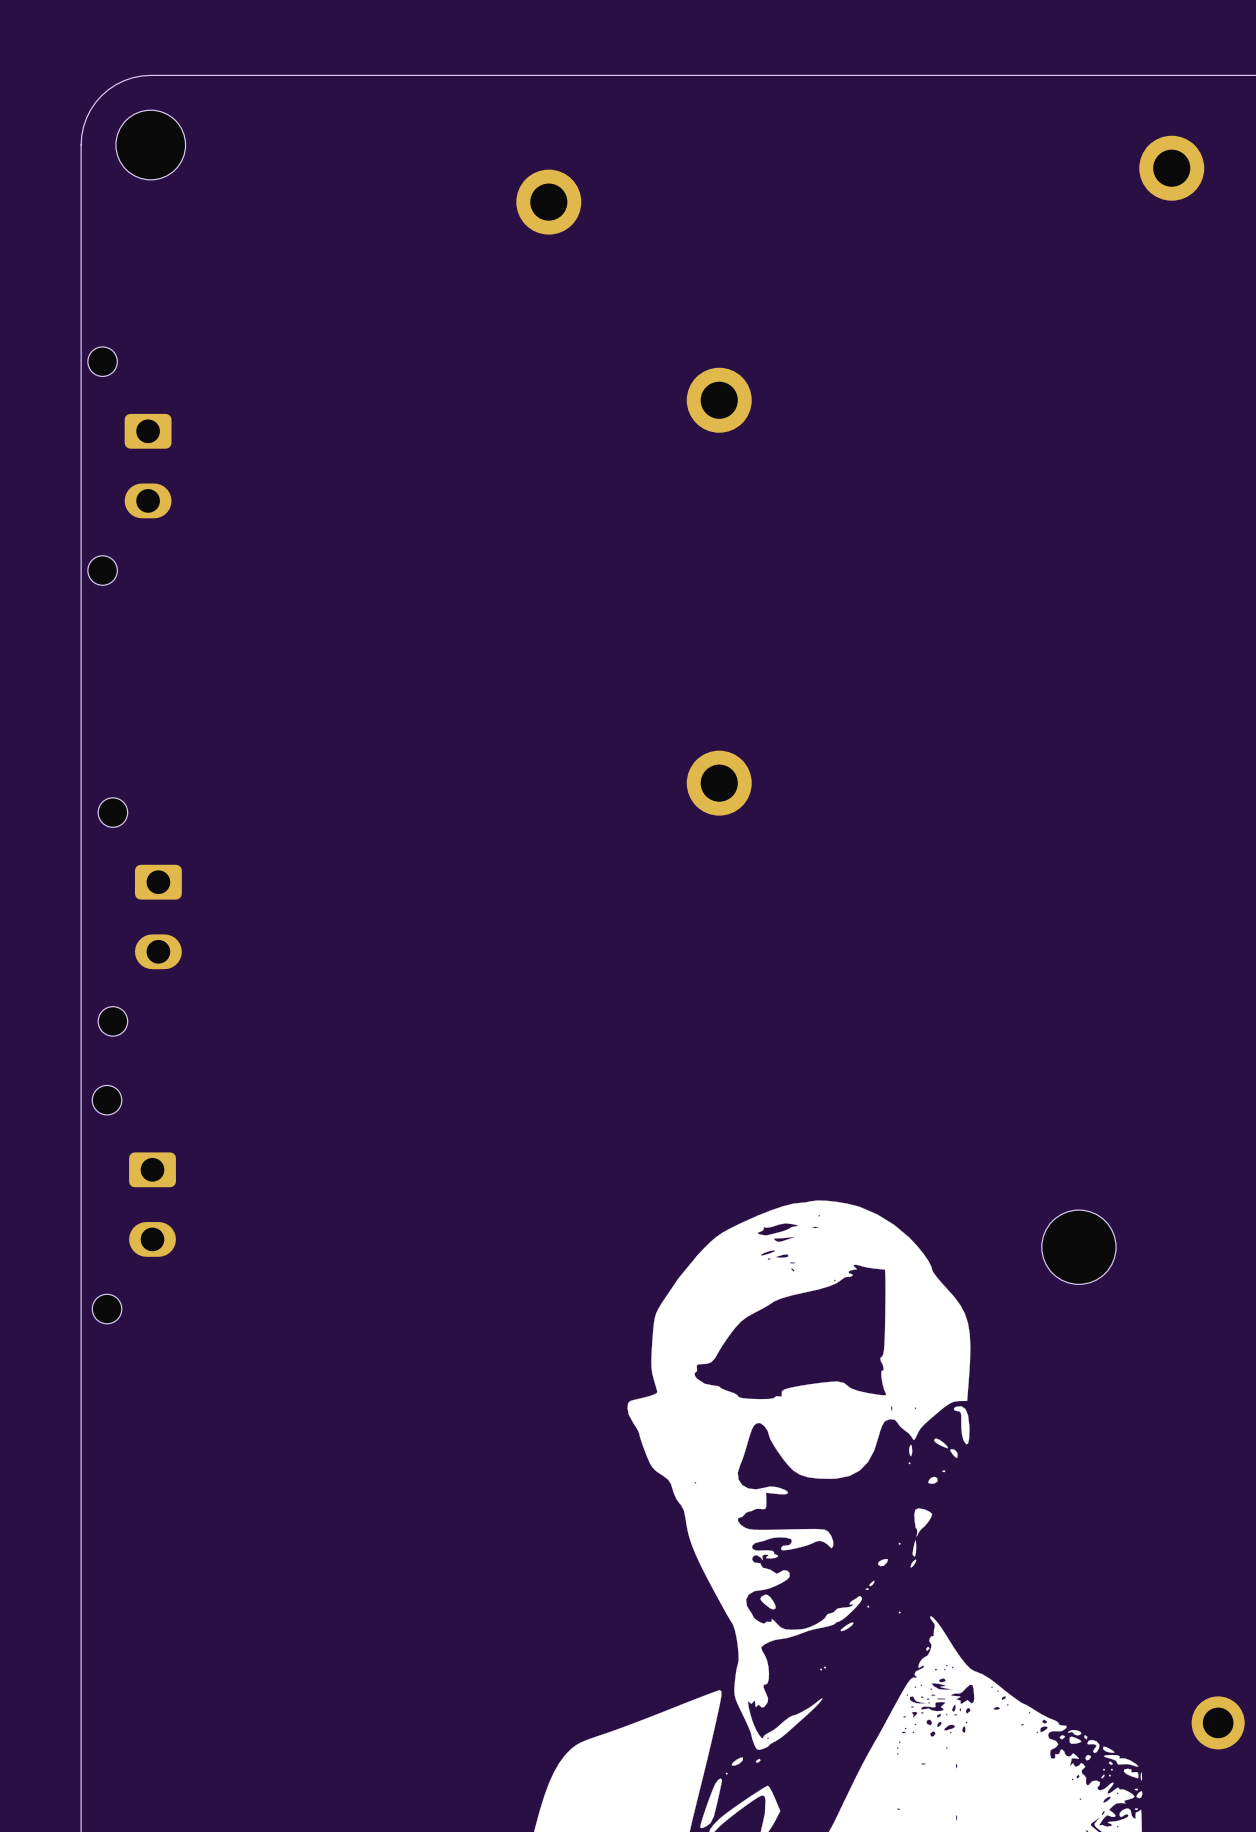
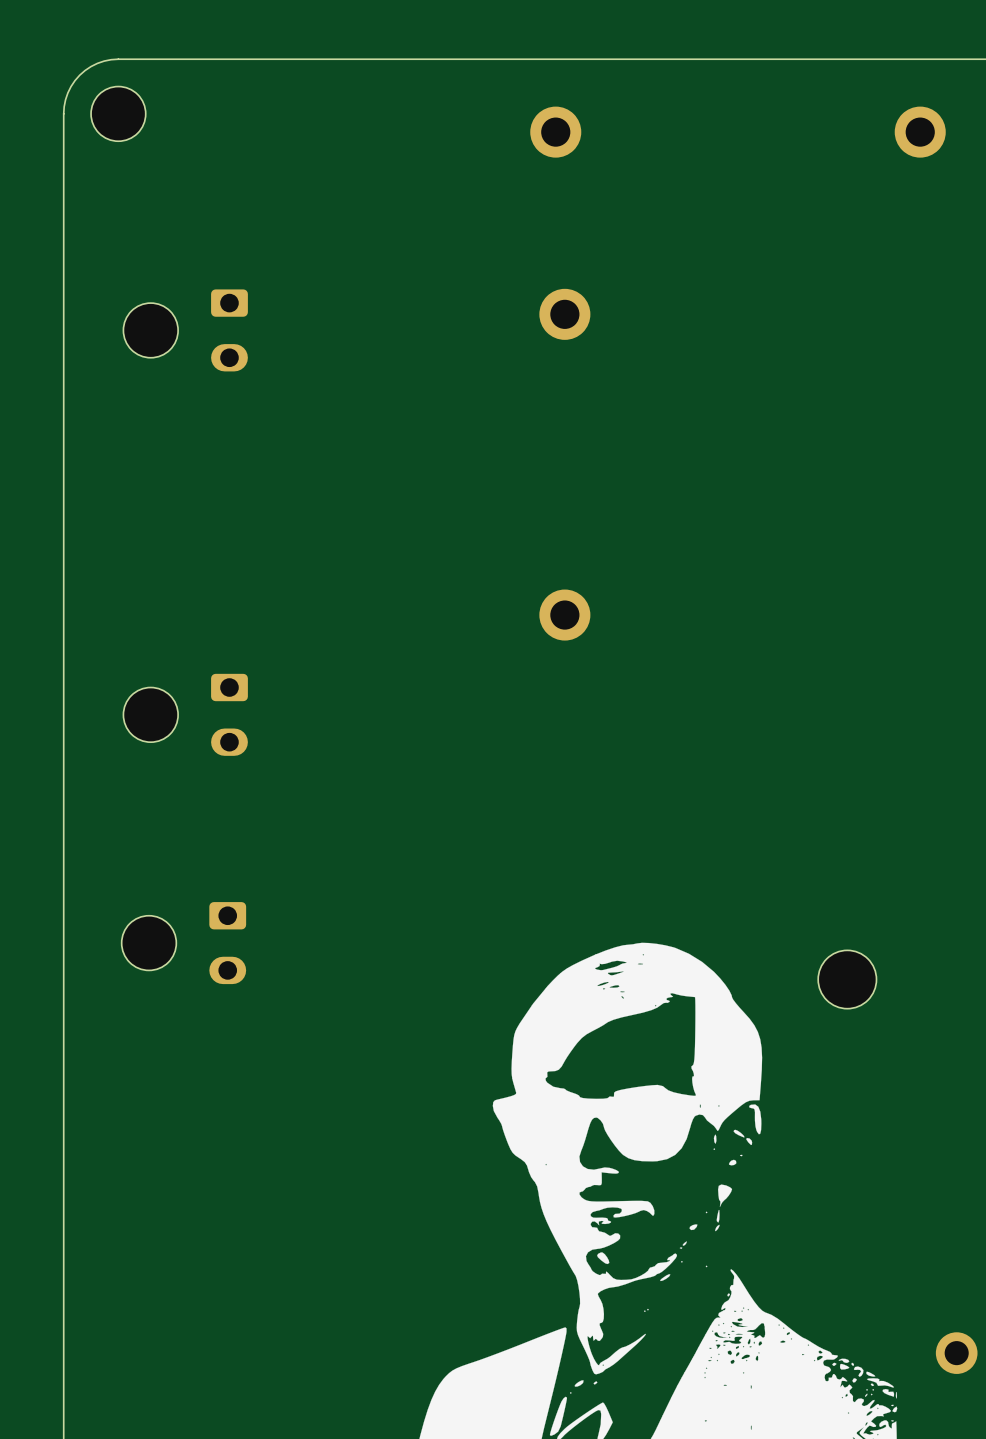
part position: (548, 202) -> (555, 132)
part: none -> (185, 330)
part: (129, 466) -> none
part: none -> (185, 714)
part: (140, 916) -> none
part: none -> (183, 943)
part: (134, 1204) -> none

